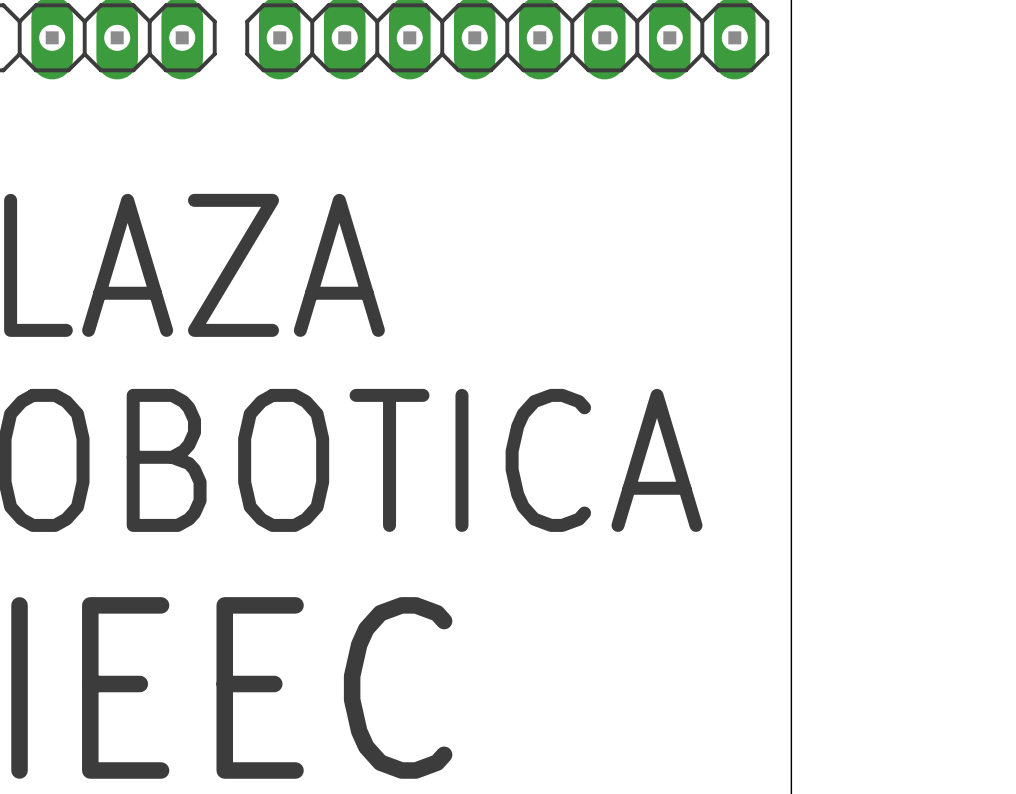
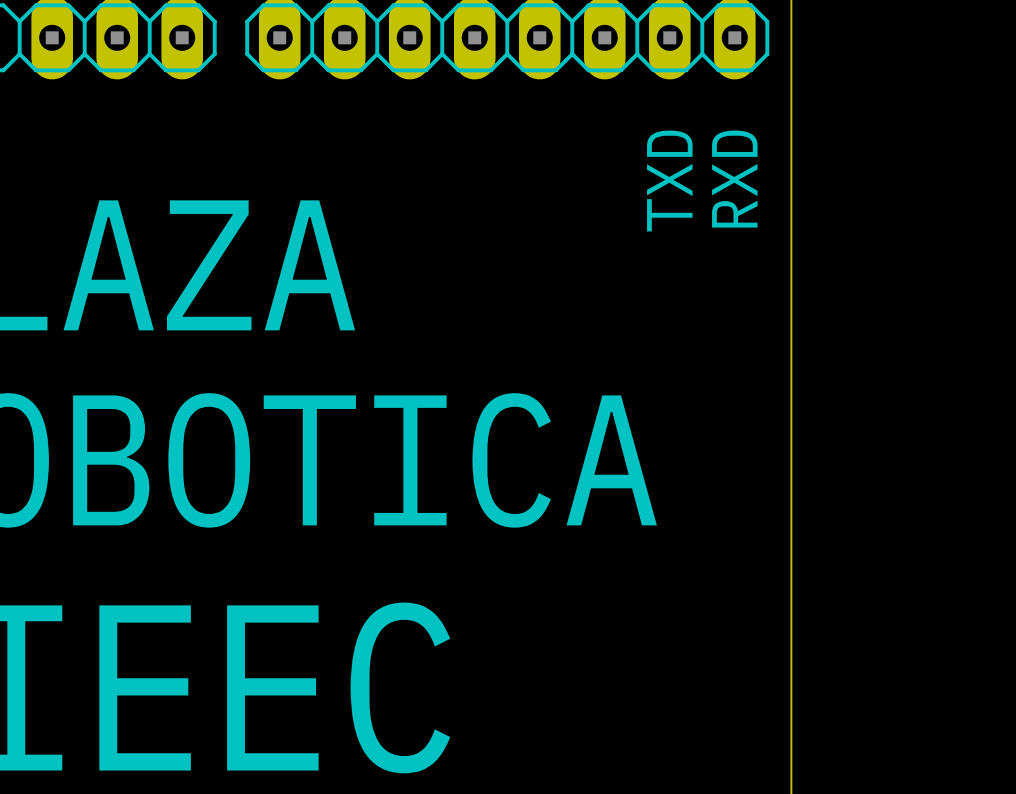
text: none -> RXD (734, 179)
text: none -> TXD (669, 180)

